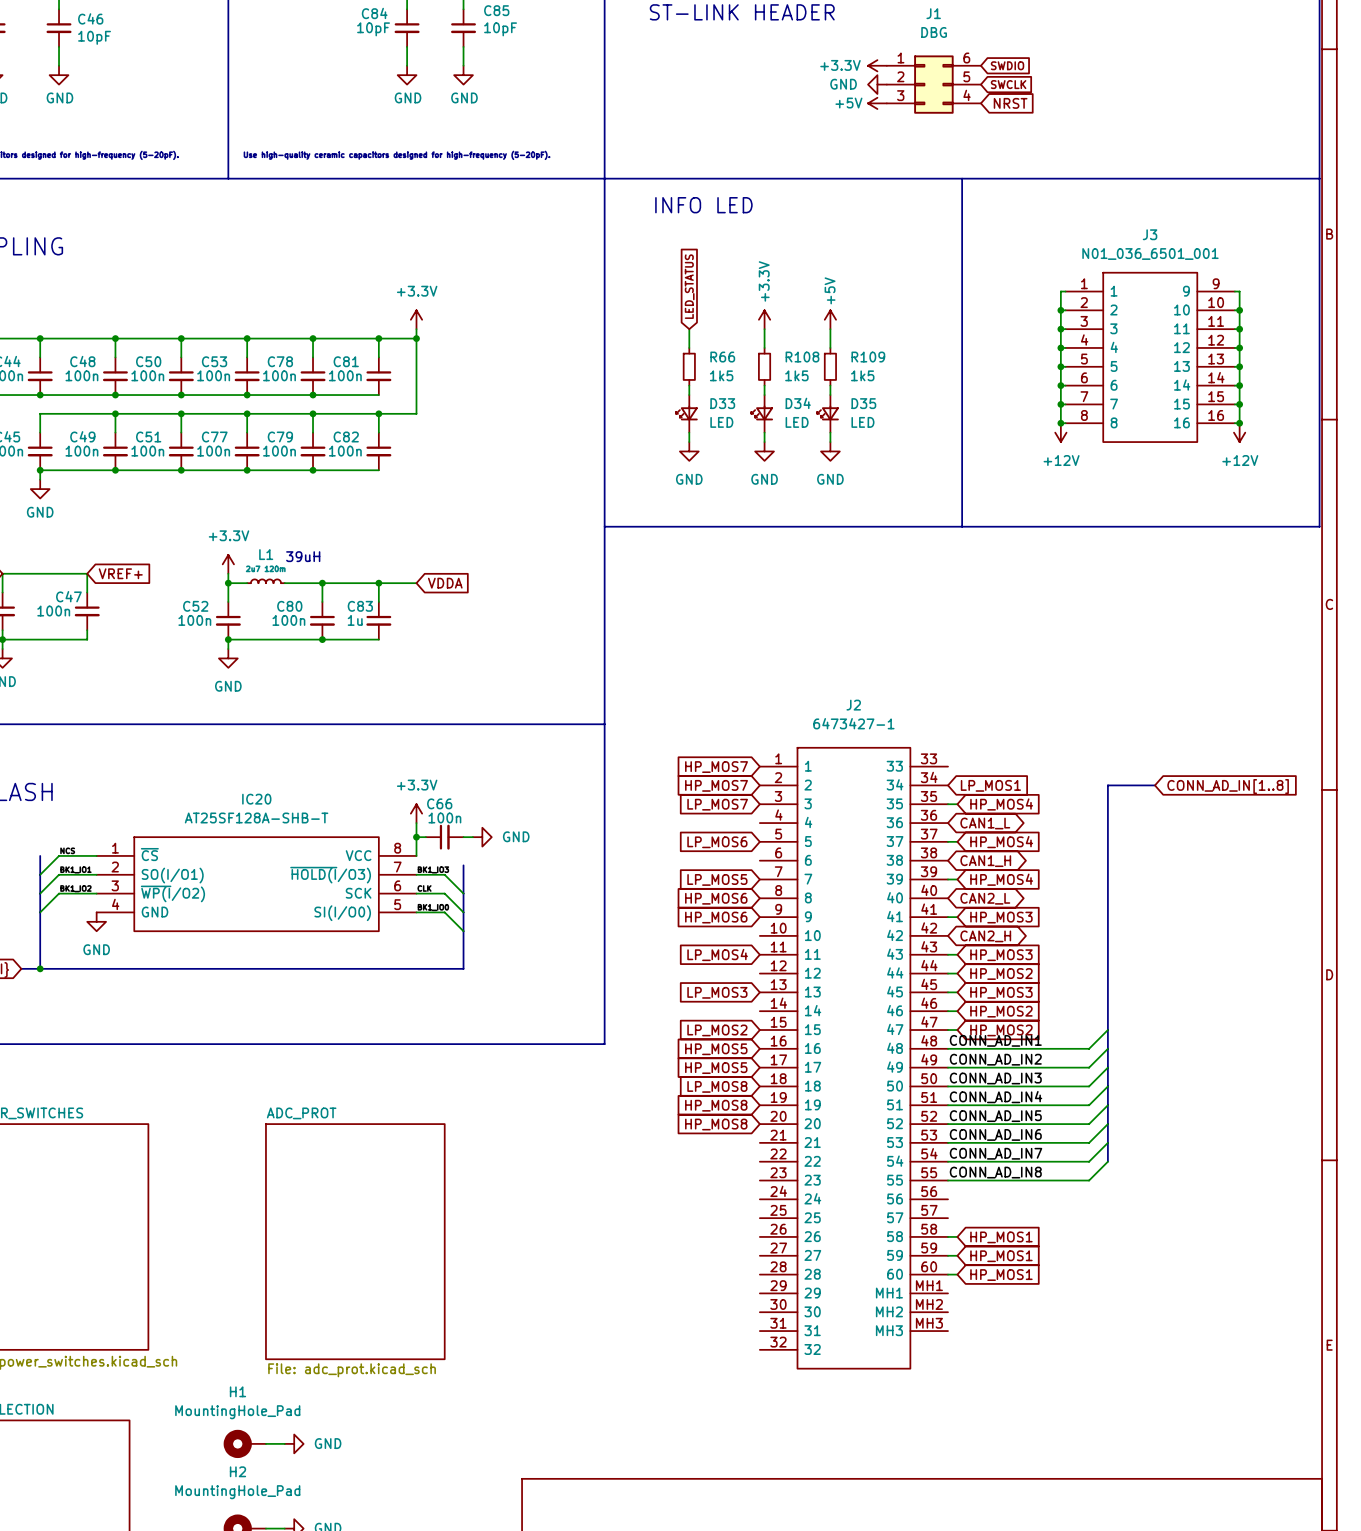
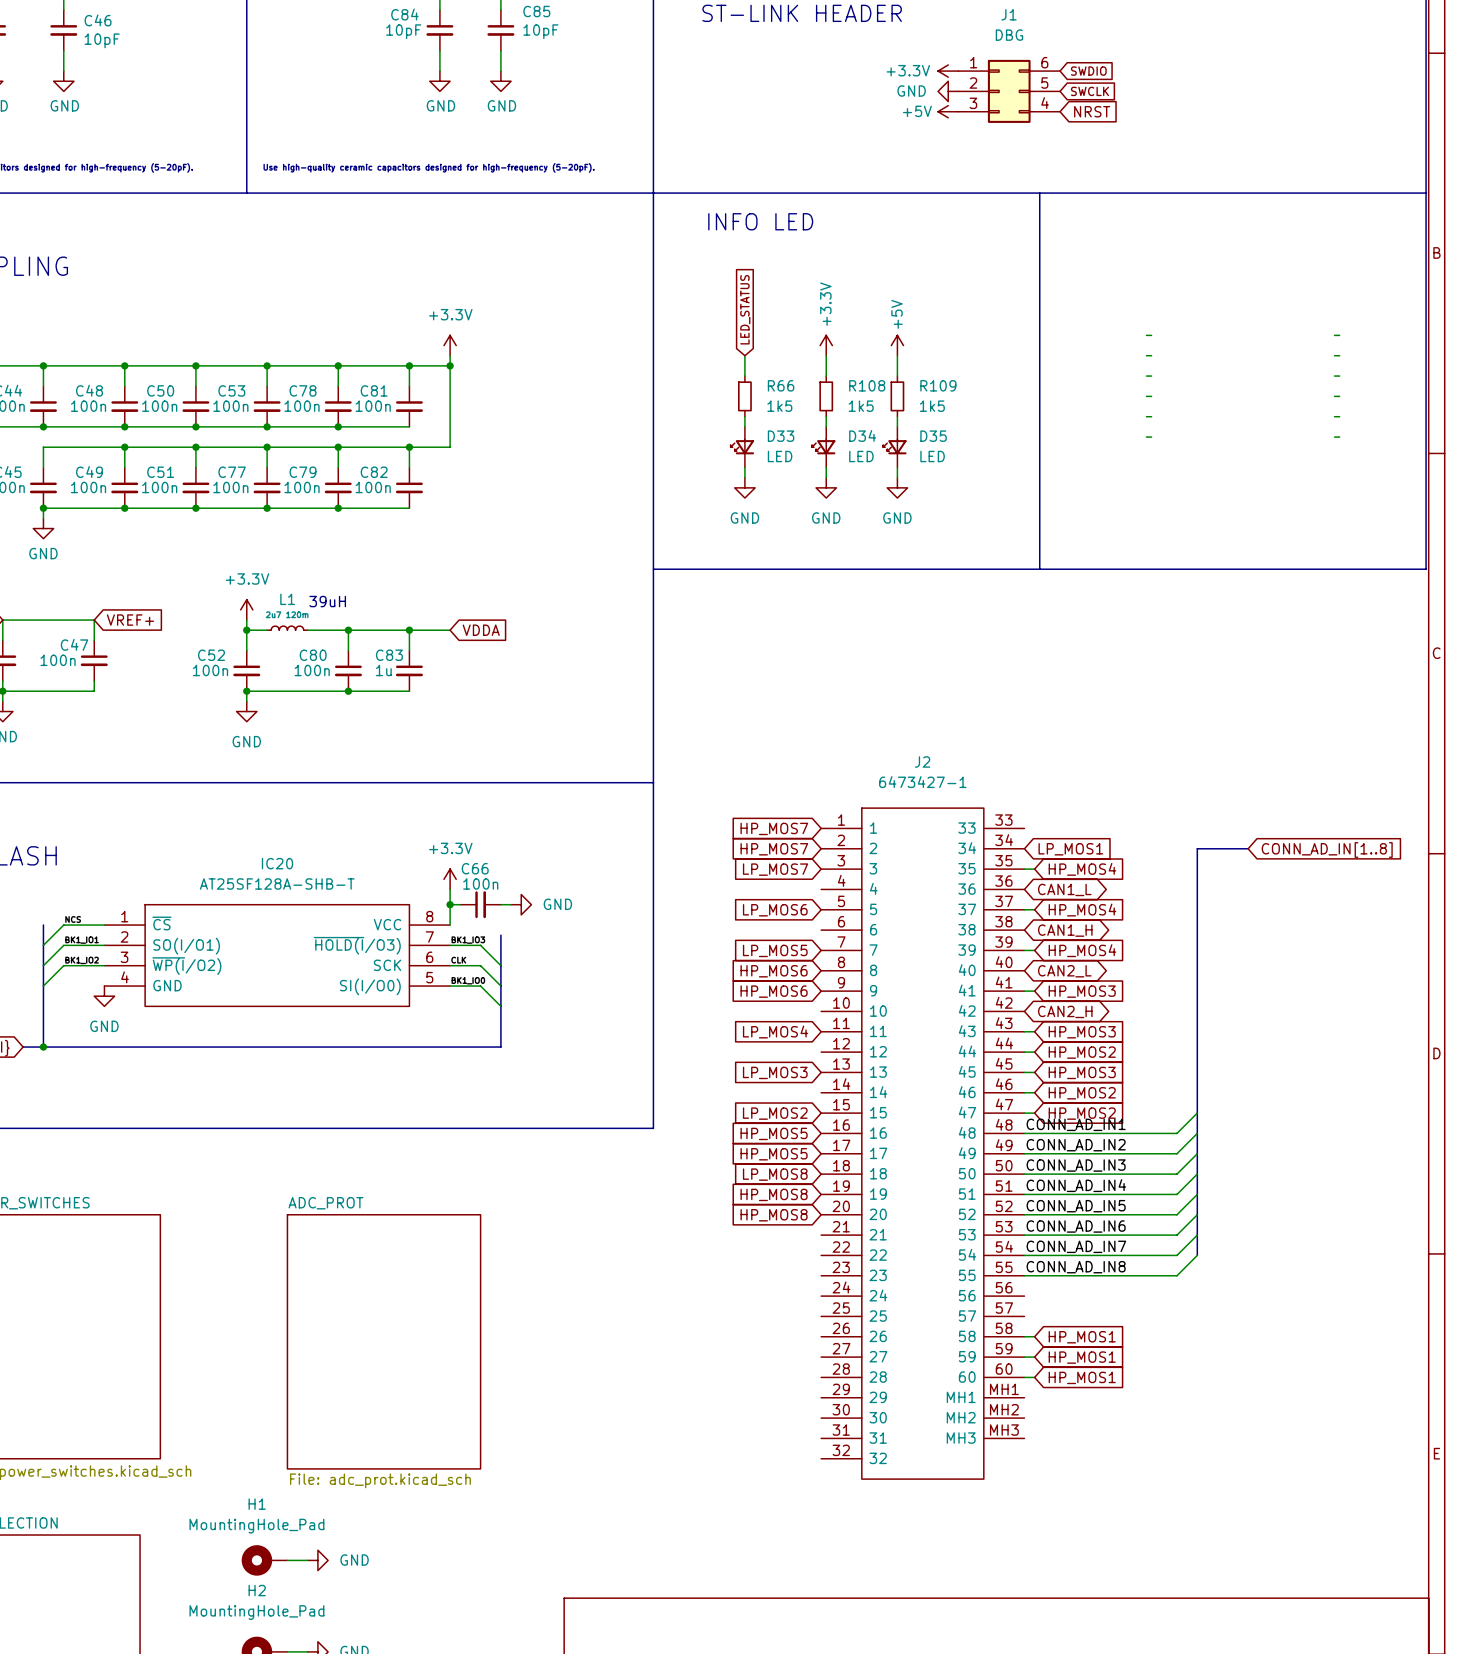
wire: (1065, 291) (1060, 291) (1060, 423) (1065, 423) -> none
wire: (1234, 291) (1239, 291) (1239, 423) (1234, 423) -> none
junction: (1060, 310) -> none
junction: (1239, 310) -> none
junction: (1060, 329) -> none
junction: (1239, 329) -> none
junction: (1060, 347) -> none
junction: (1239, 347) -> none
J3: N01_036_6501_001 (1150, 357) -> none
junction: (1060, 366) -> none
junction: (1239, 366) -> none
junction: (1060, 385) -> none
junction: (1239, 385) -> none
junction: (1060, 404) -> none
junction: (1239, 404) -> none
junction: (1060, 423) -> none
junction: (1239, 423) -> none
power symbol: +12V (1060, 432) -> none
power symbol: +12V (1239, 432) -> none

